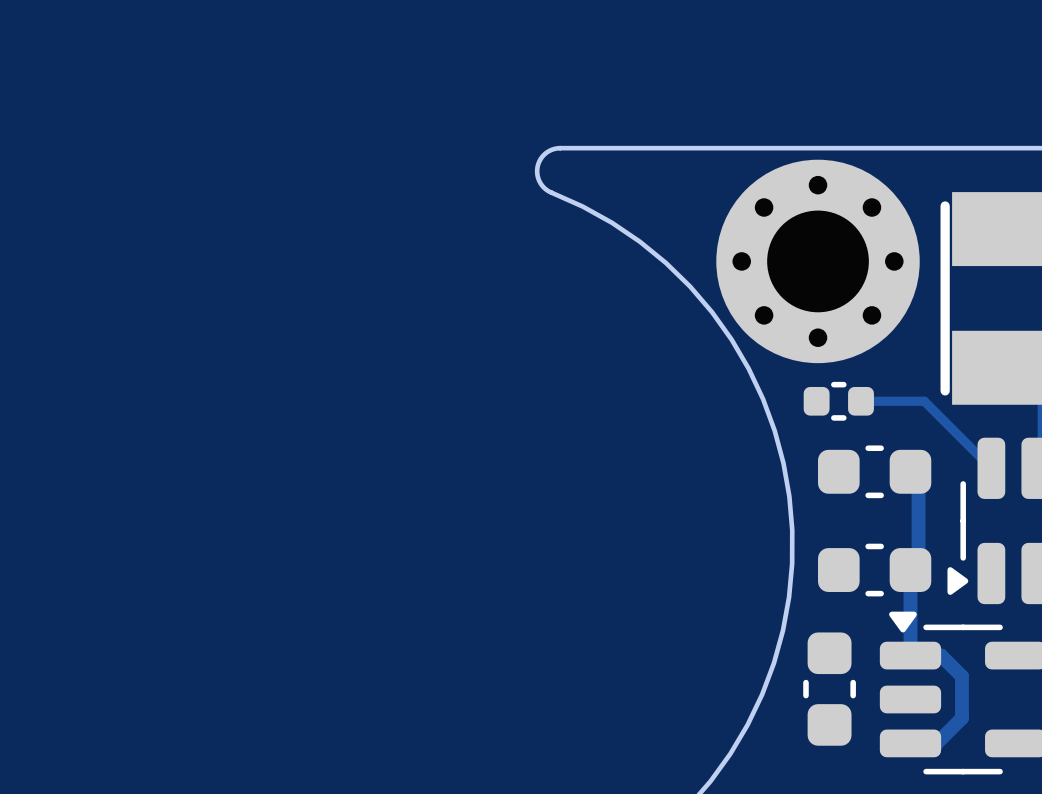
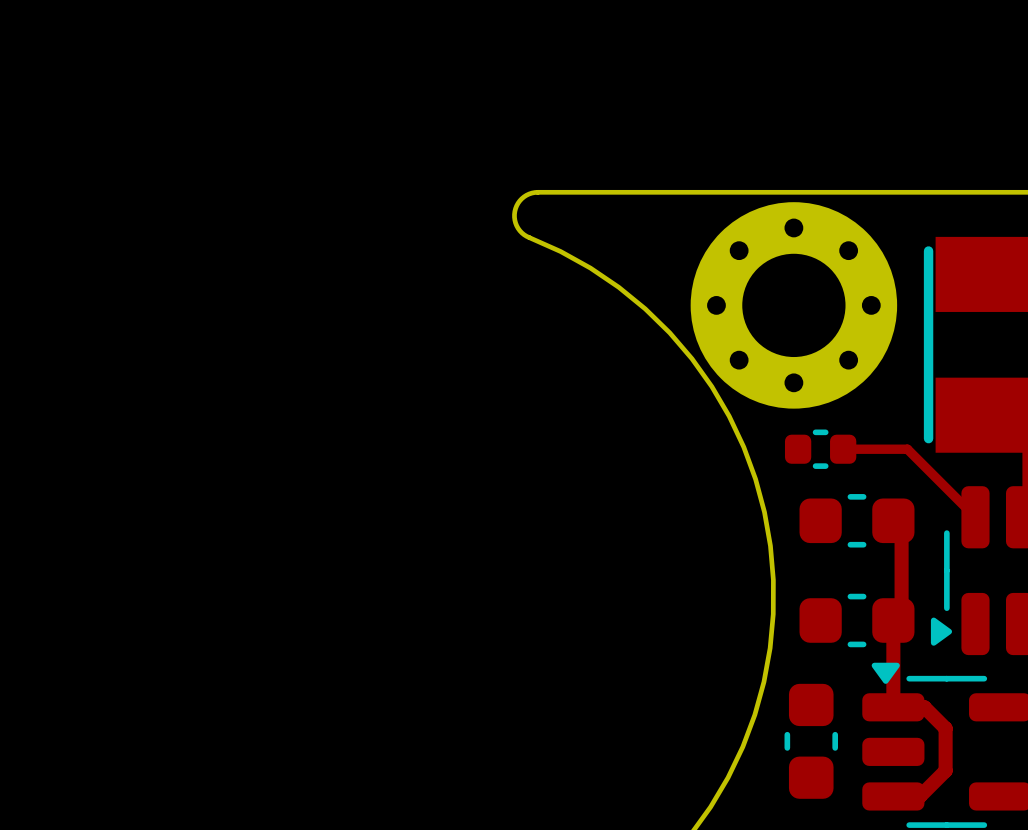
part footprint: [716, 159, 920, 364] -> [690, 202, 898, 409]

